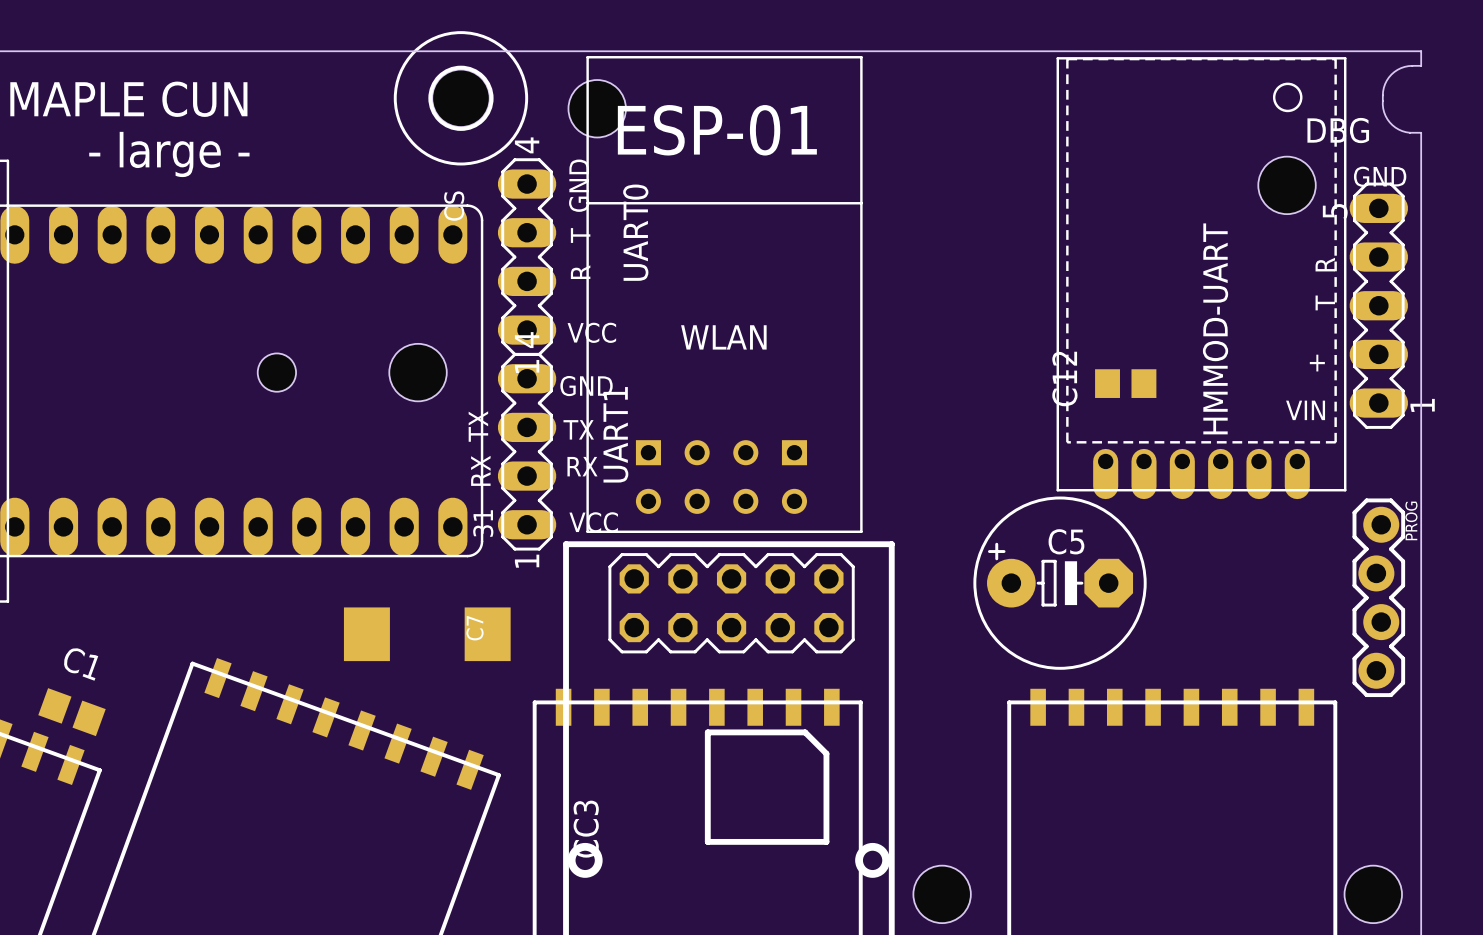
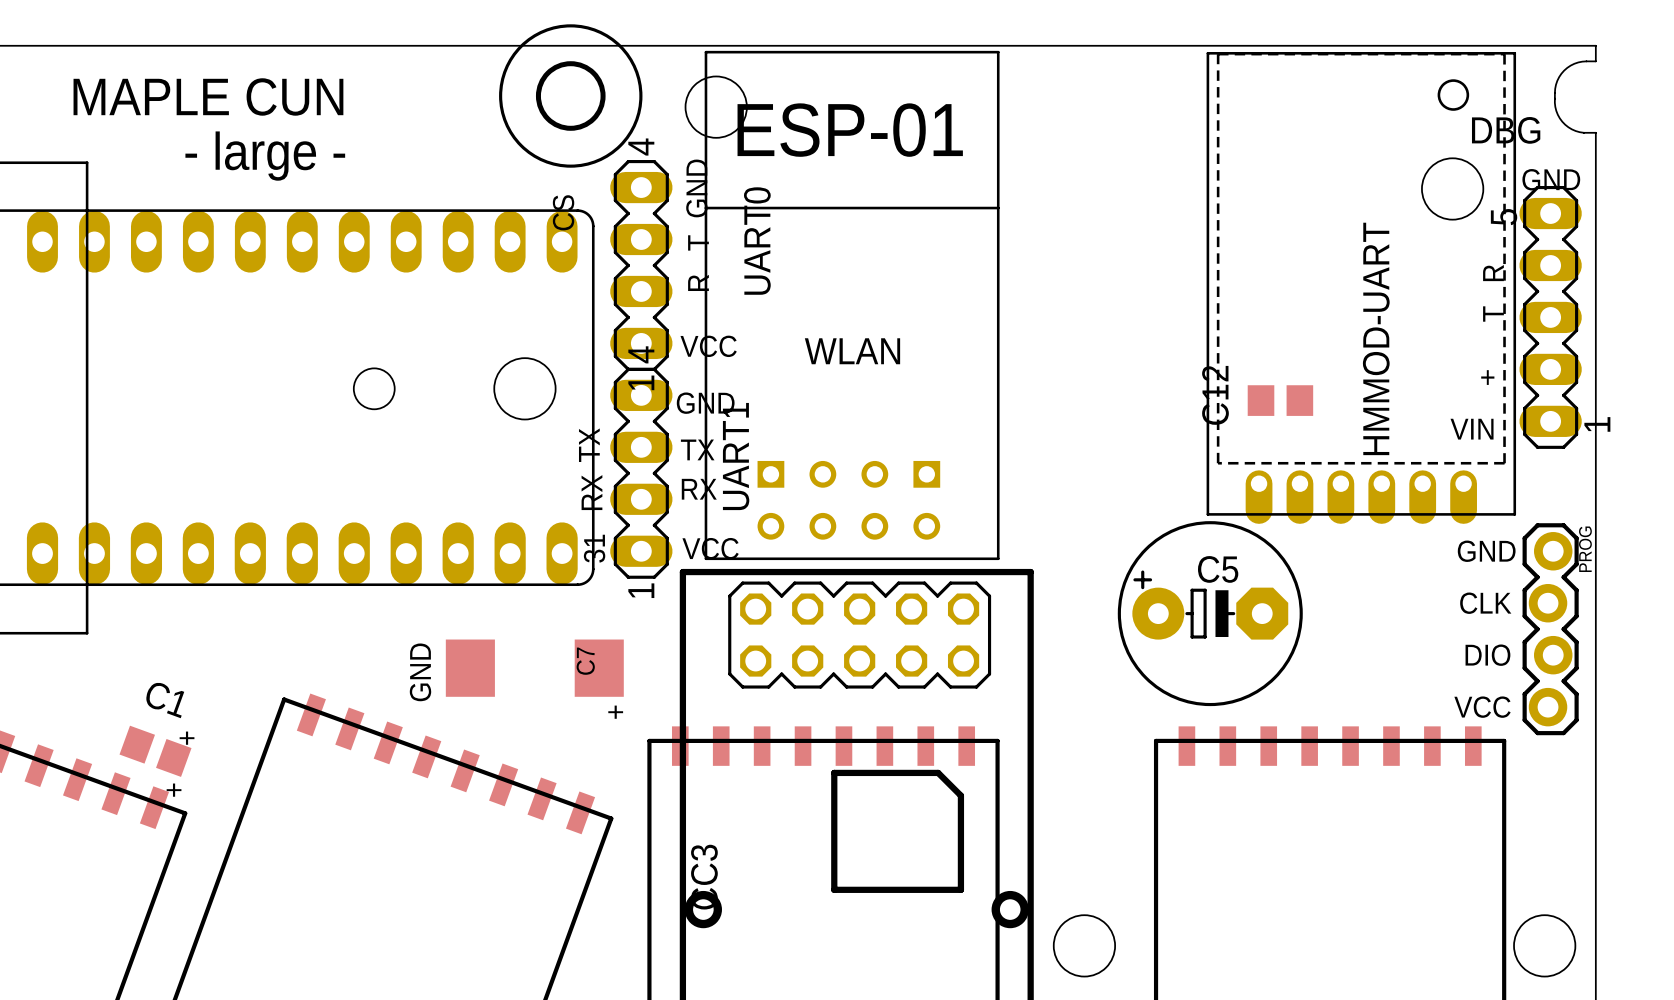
text: none -> GND (1486, 551)
text: none -> CLK (1485, 603)
text: none -> DIO (1487, 655)
text: none -> GND (420, 672)
text: none -> VCC (1482, 707)
text: none -> + (615, 712)
text: none -> + (187, 738)
text: none -> + (174, 790)

